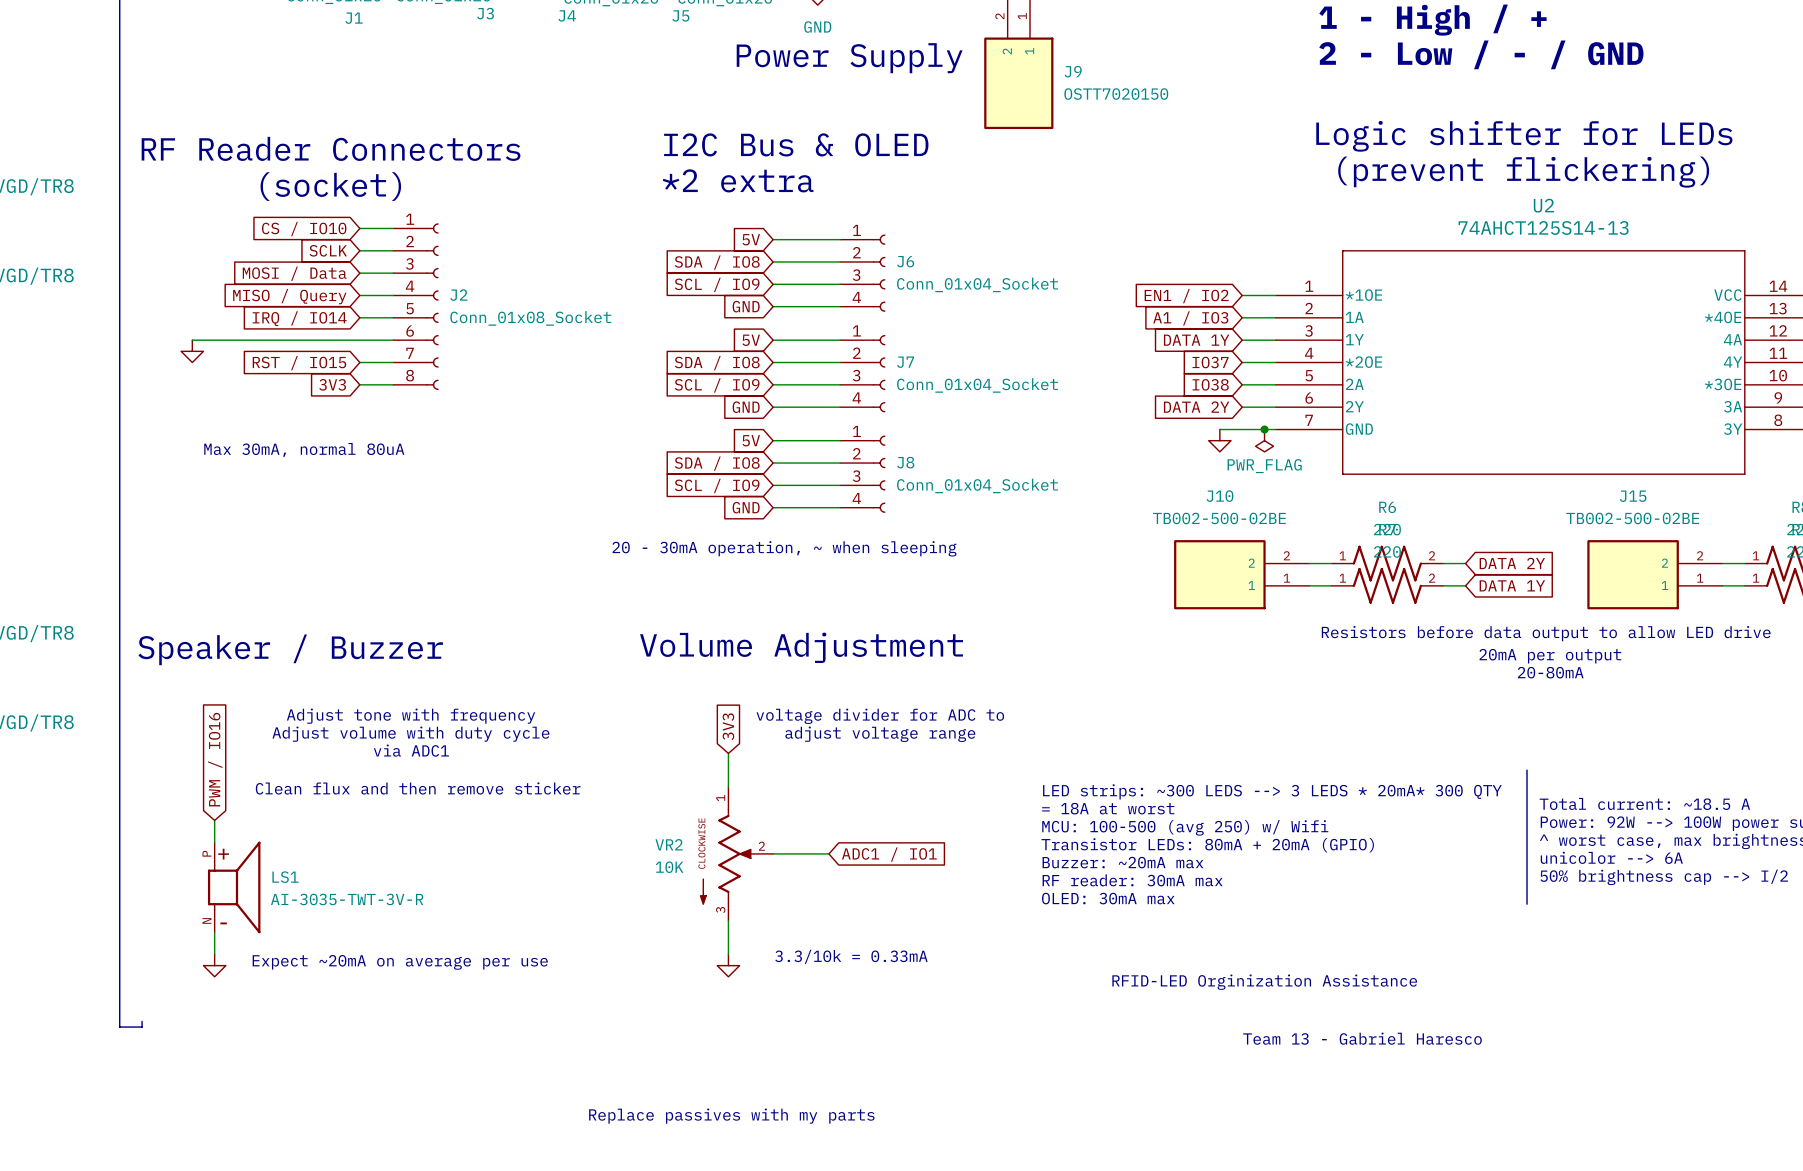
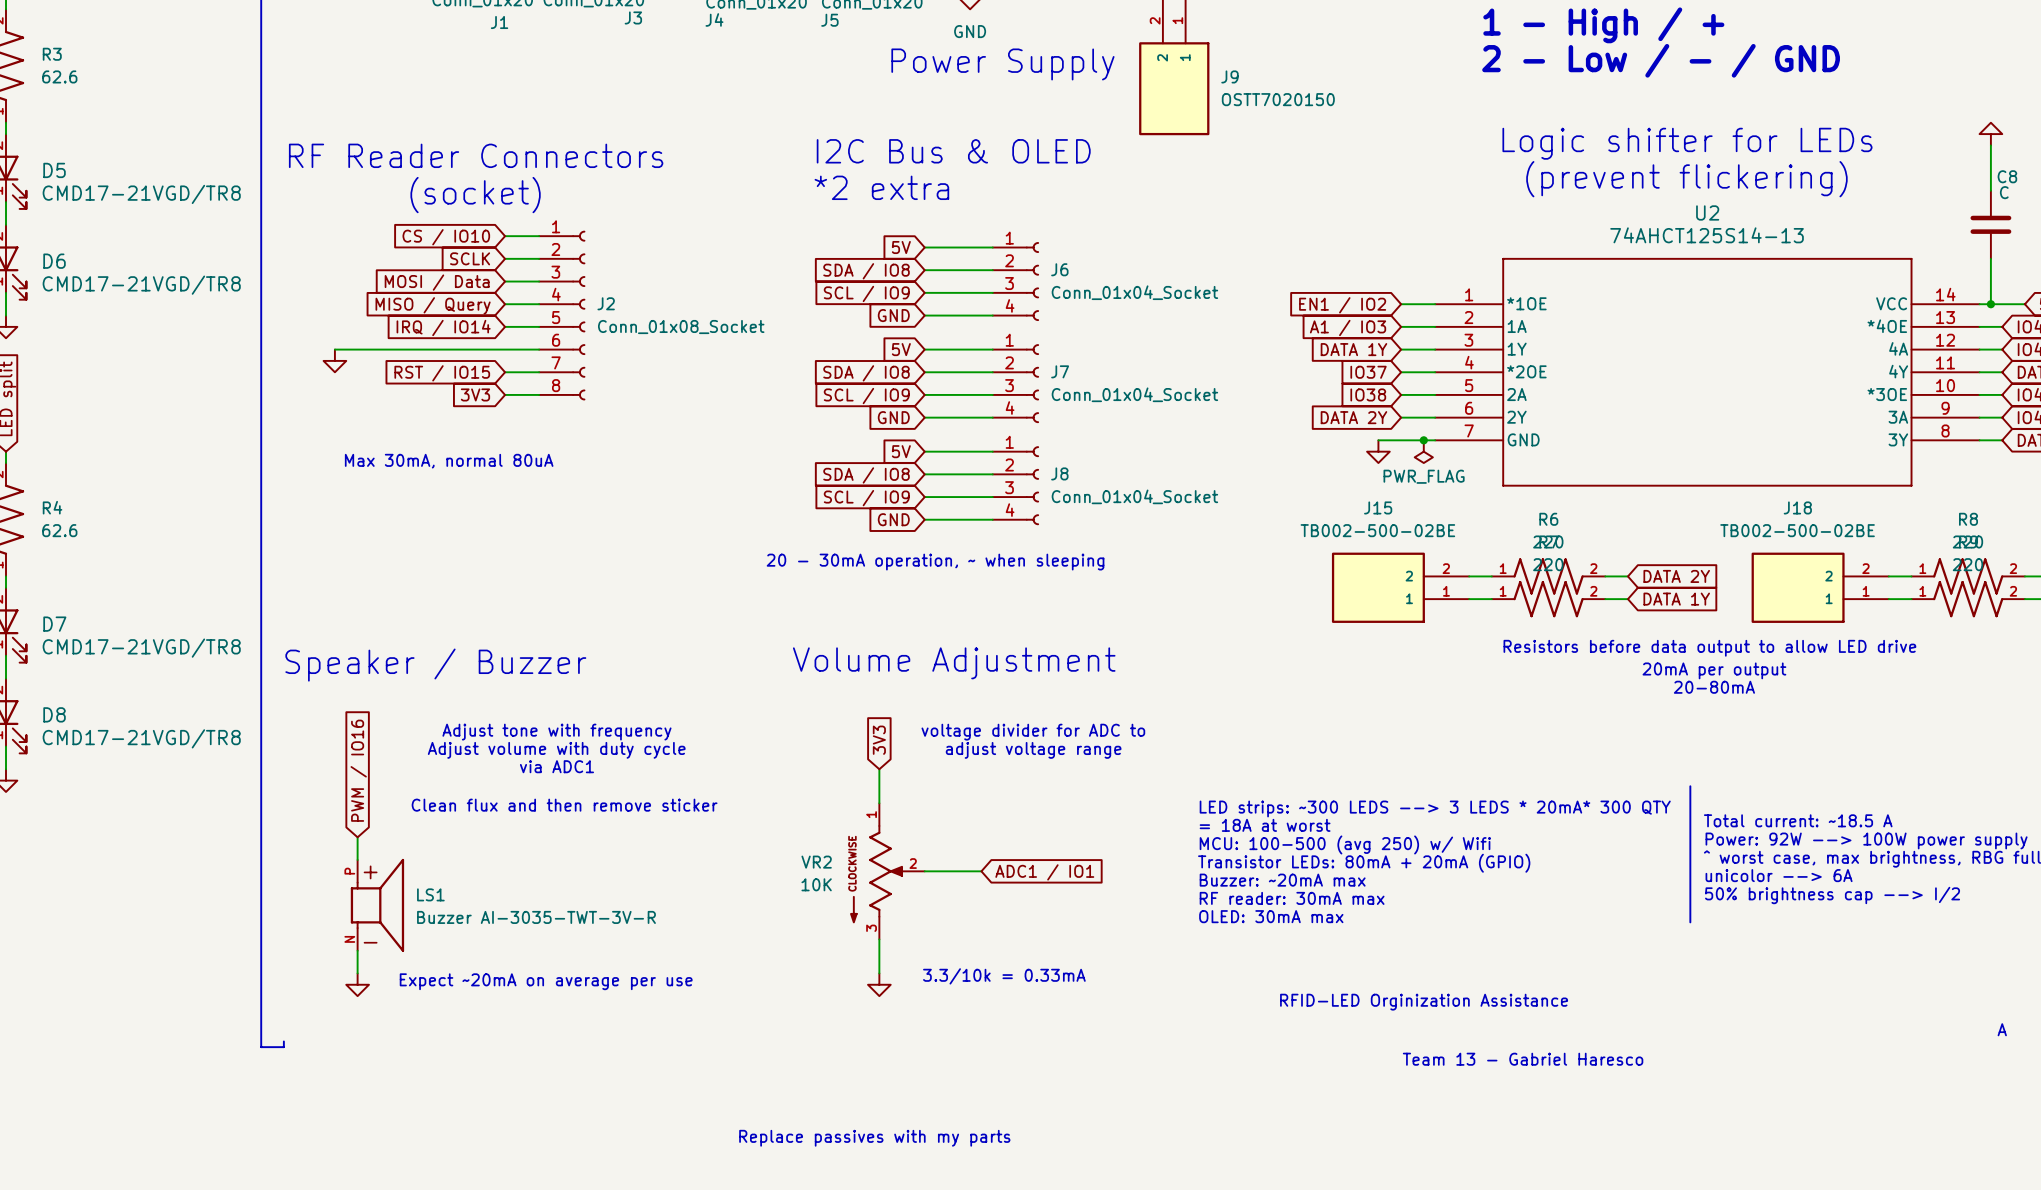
J10 name: J10 (1220, 496) -> J15 (1378, 507)
J15 name: J15 (1633, 496) -> J18 (1797, 507)
LS1 value: AI-3035-TWT-3V-R (347, 899) -> Buzzer AI-3035-TWT-3V-R (536, 917)

